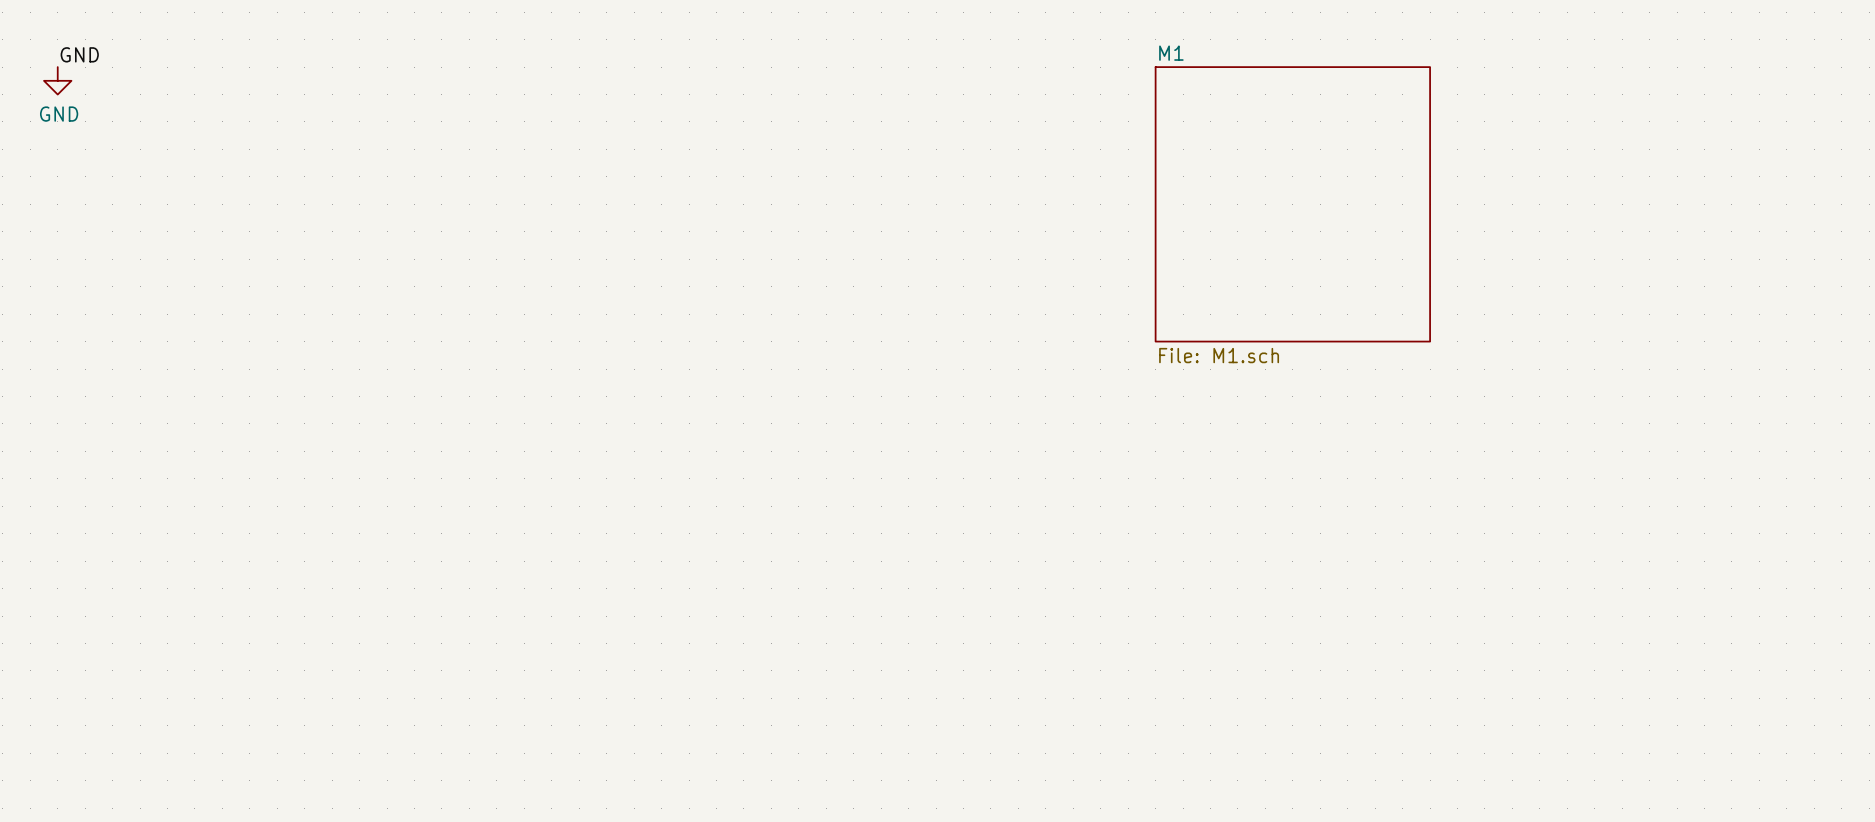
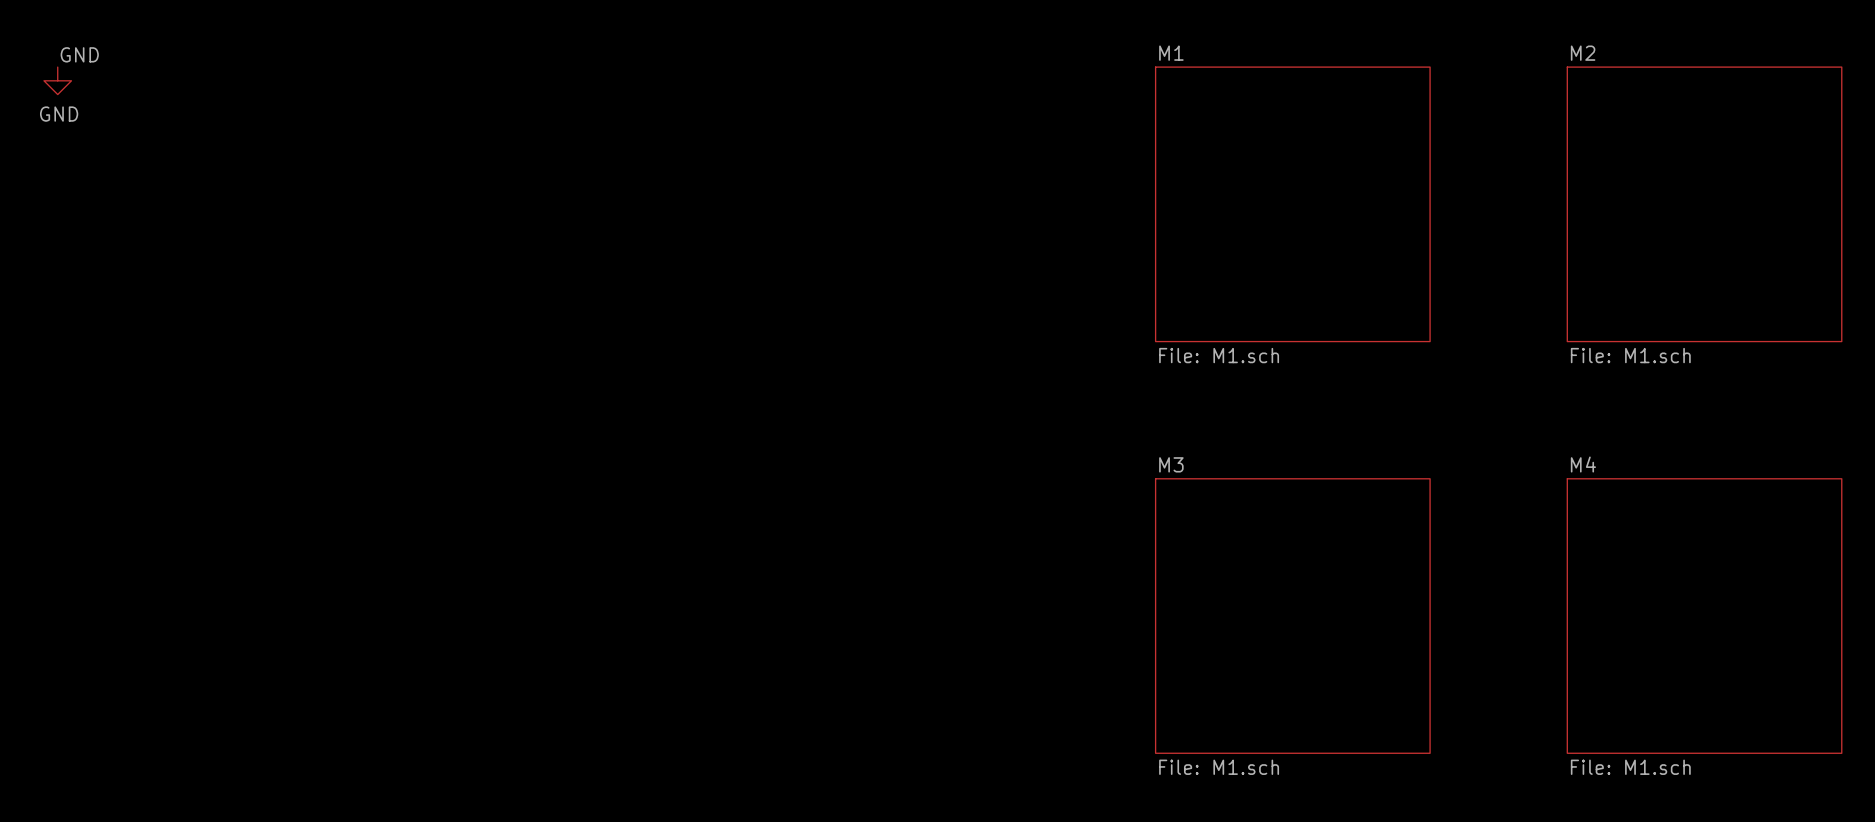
sheet M2: none -> File: M1.sch (1704, 204)
sheet M3: none -> File: M1.sch (1292, 616)
sheet M4: none -> File: M1.sch (1704, 616)

